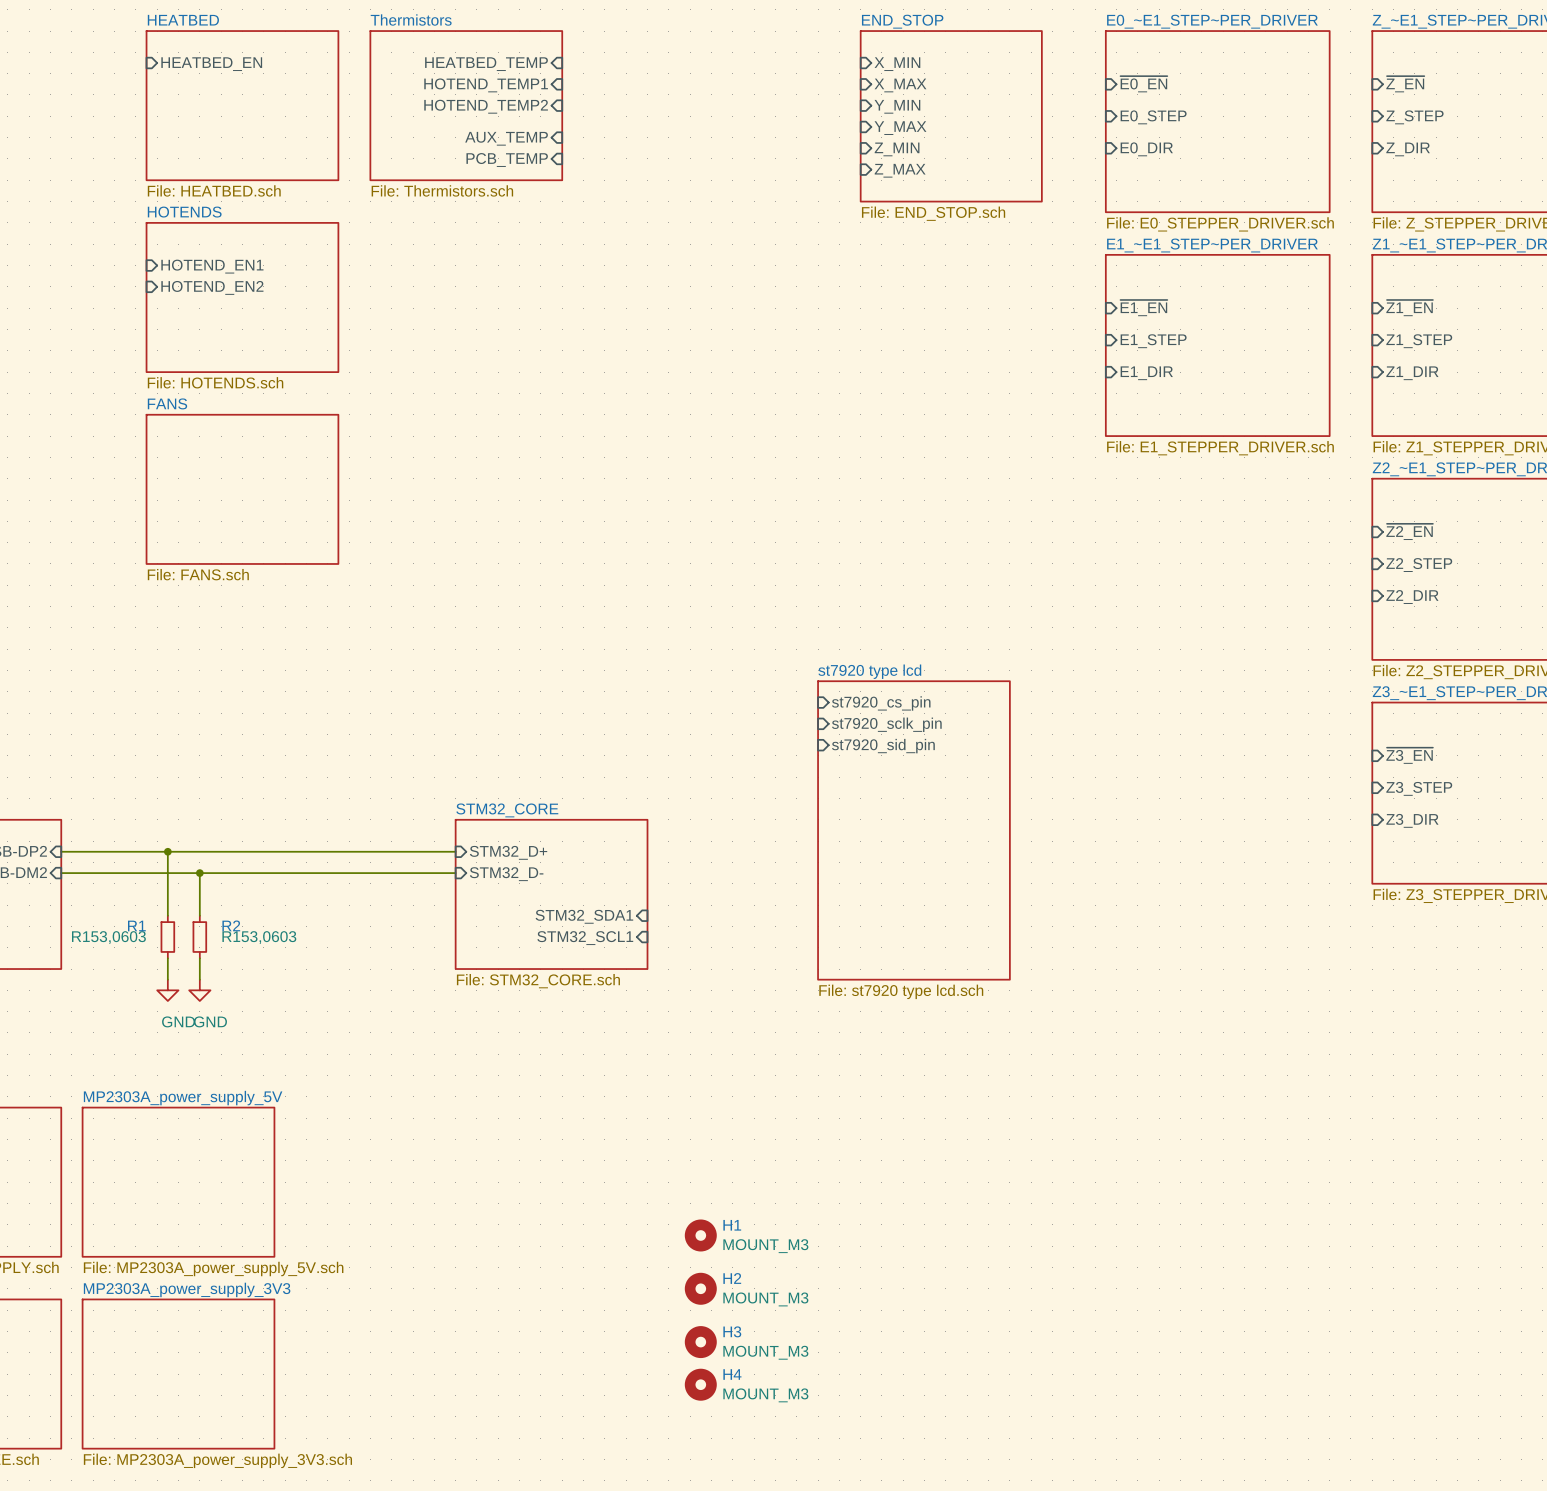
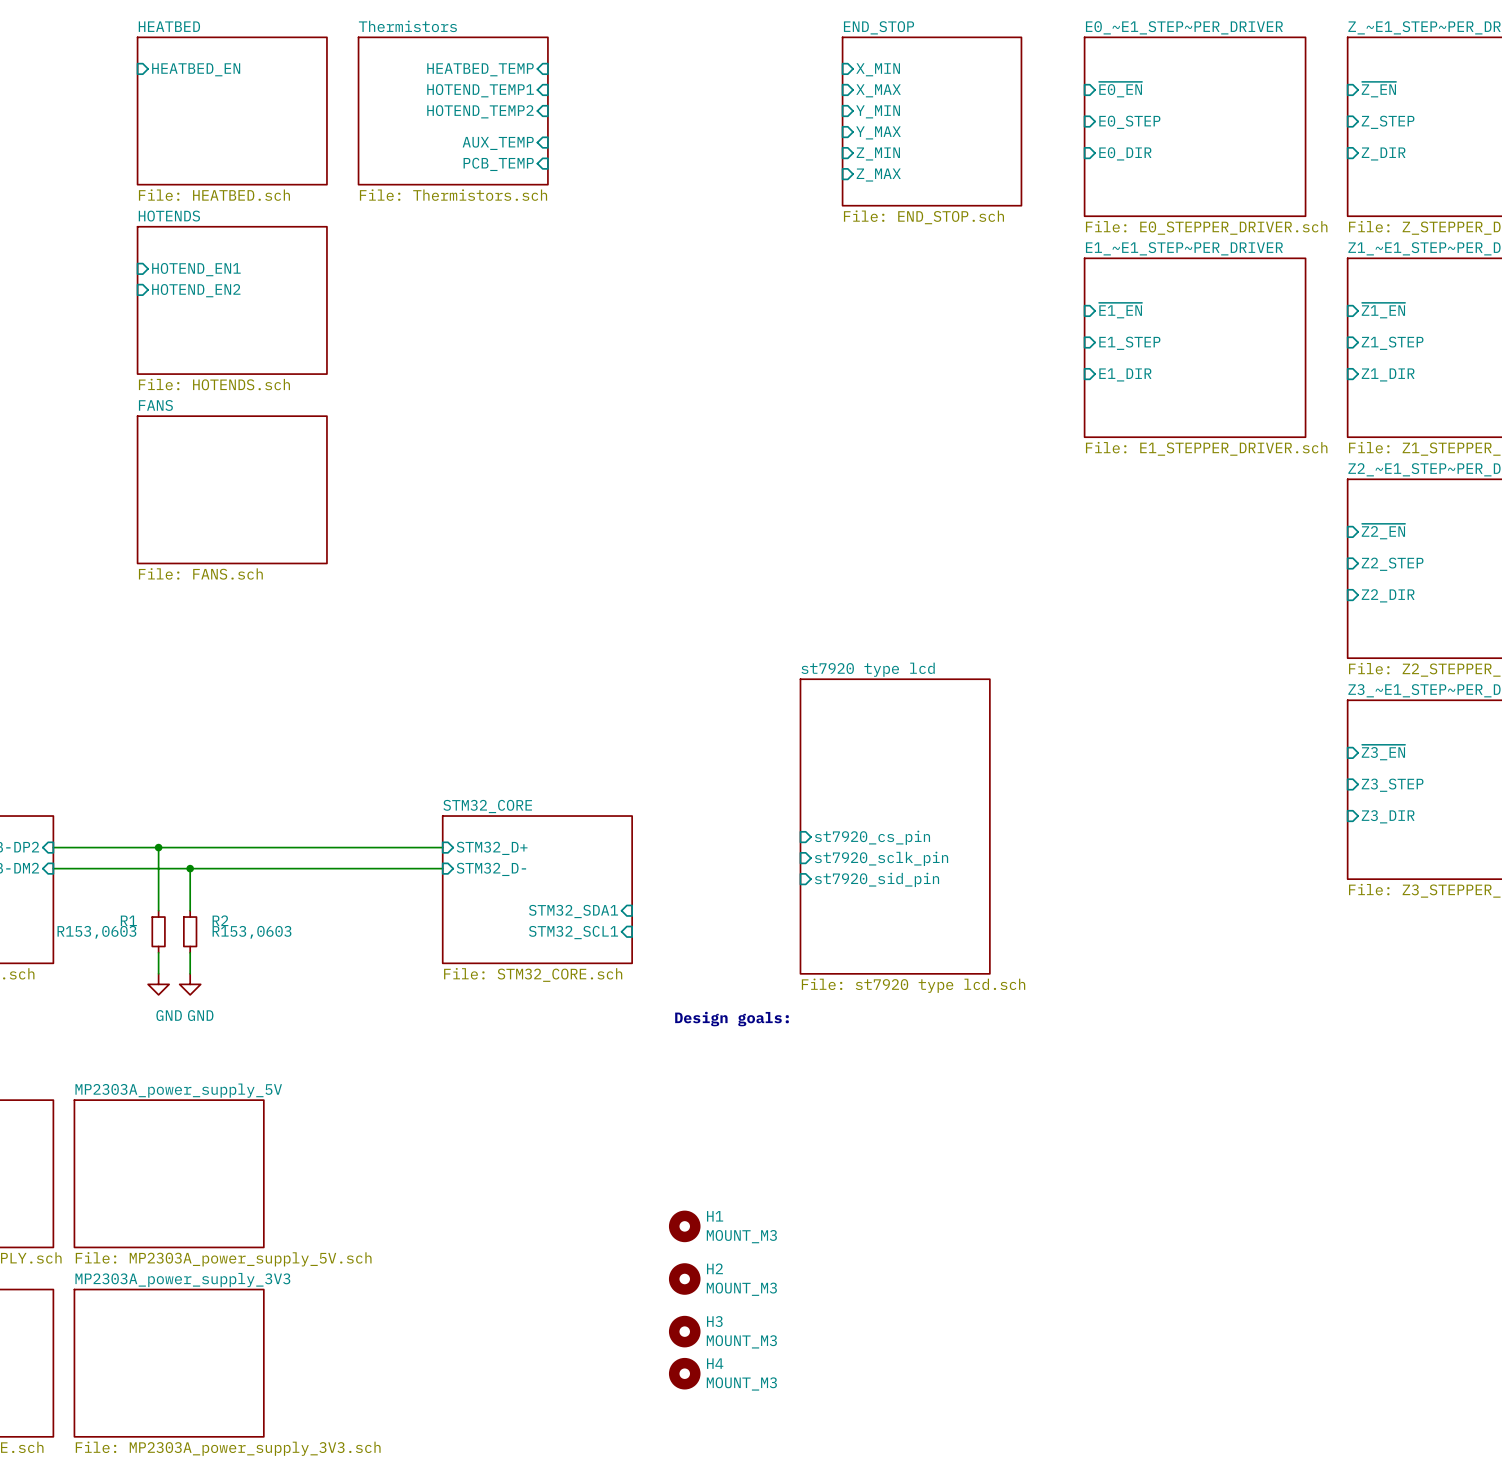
sheet pin position: st7920_cs_pin (881, 703) -> st7920_cs_pin (872, 837)
sheet pin position: st7920_sclk_pin (886, 724) -> st7920_sclk_pin (881, 858)
sheet pin position: st7920_sid_pin (883, 746) -> st7920_sid_pin (876, 879)
text: none -> Design goals: (732, 1019)

